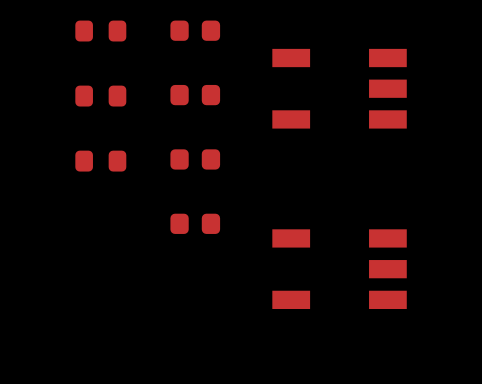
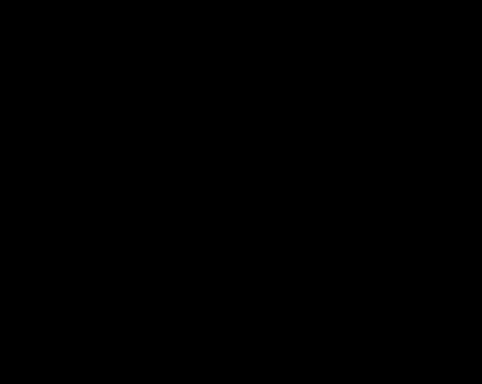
part: (195, 30) -> none
part: (100, 31) -> none
part: (339, 88) -> none
part: (195, 95) -> none
part: (100, 96) -> none
part: (195, 159) -> none
part: (100, 161) -> none
part: (195, 223) -> none
part: (339, 269) -> none

